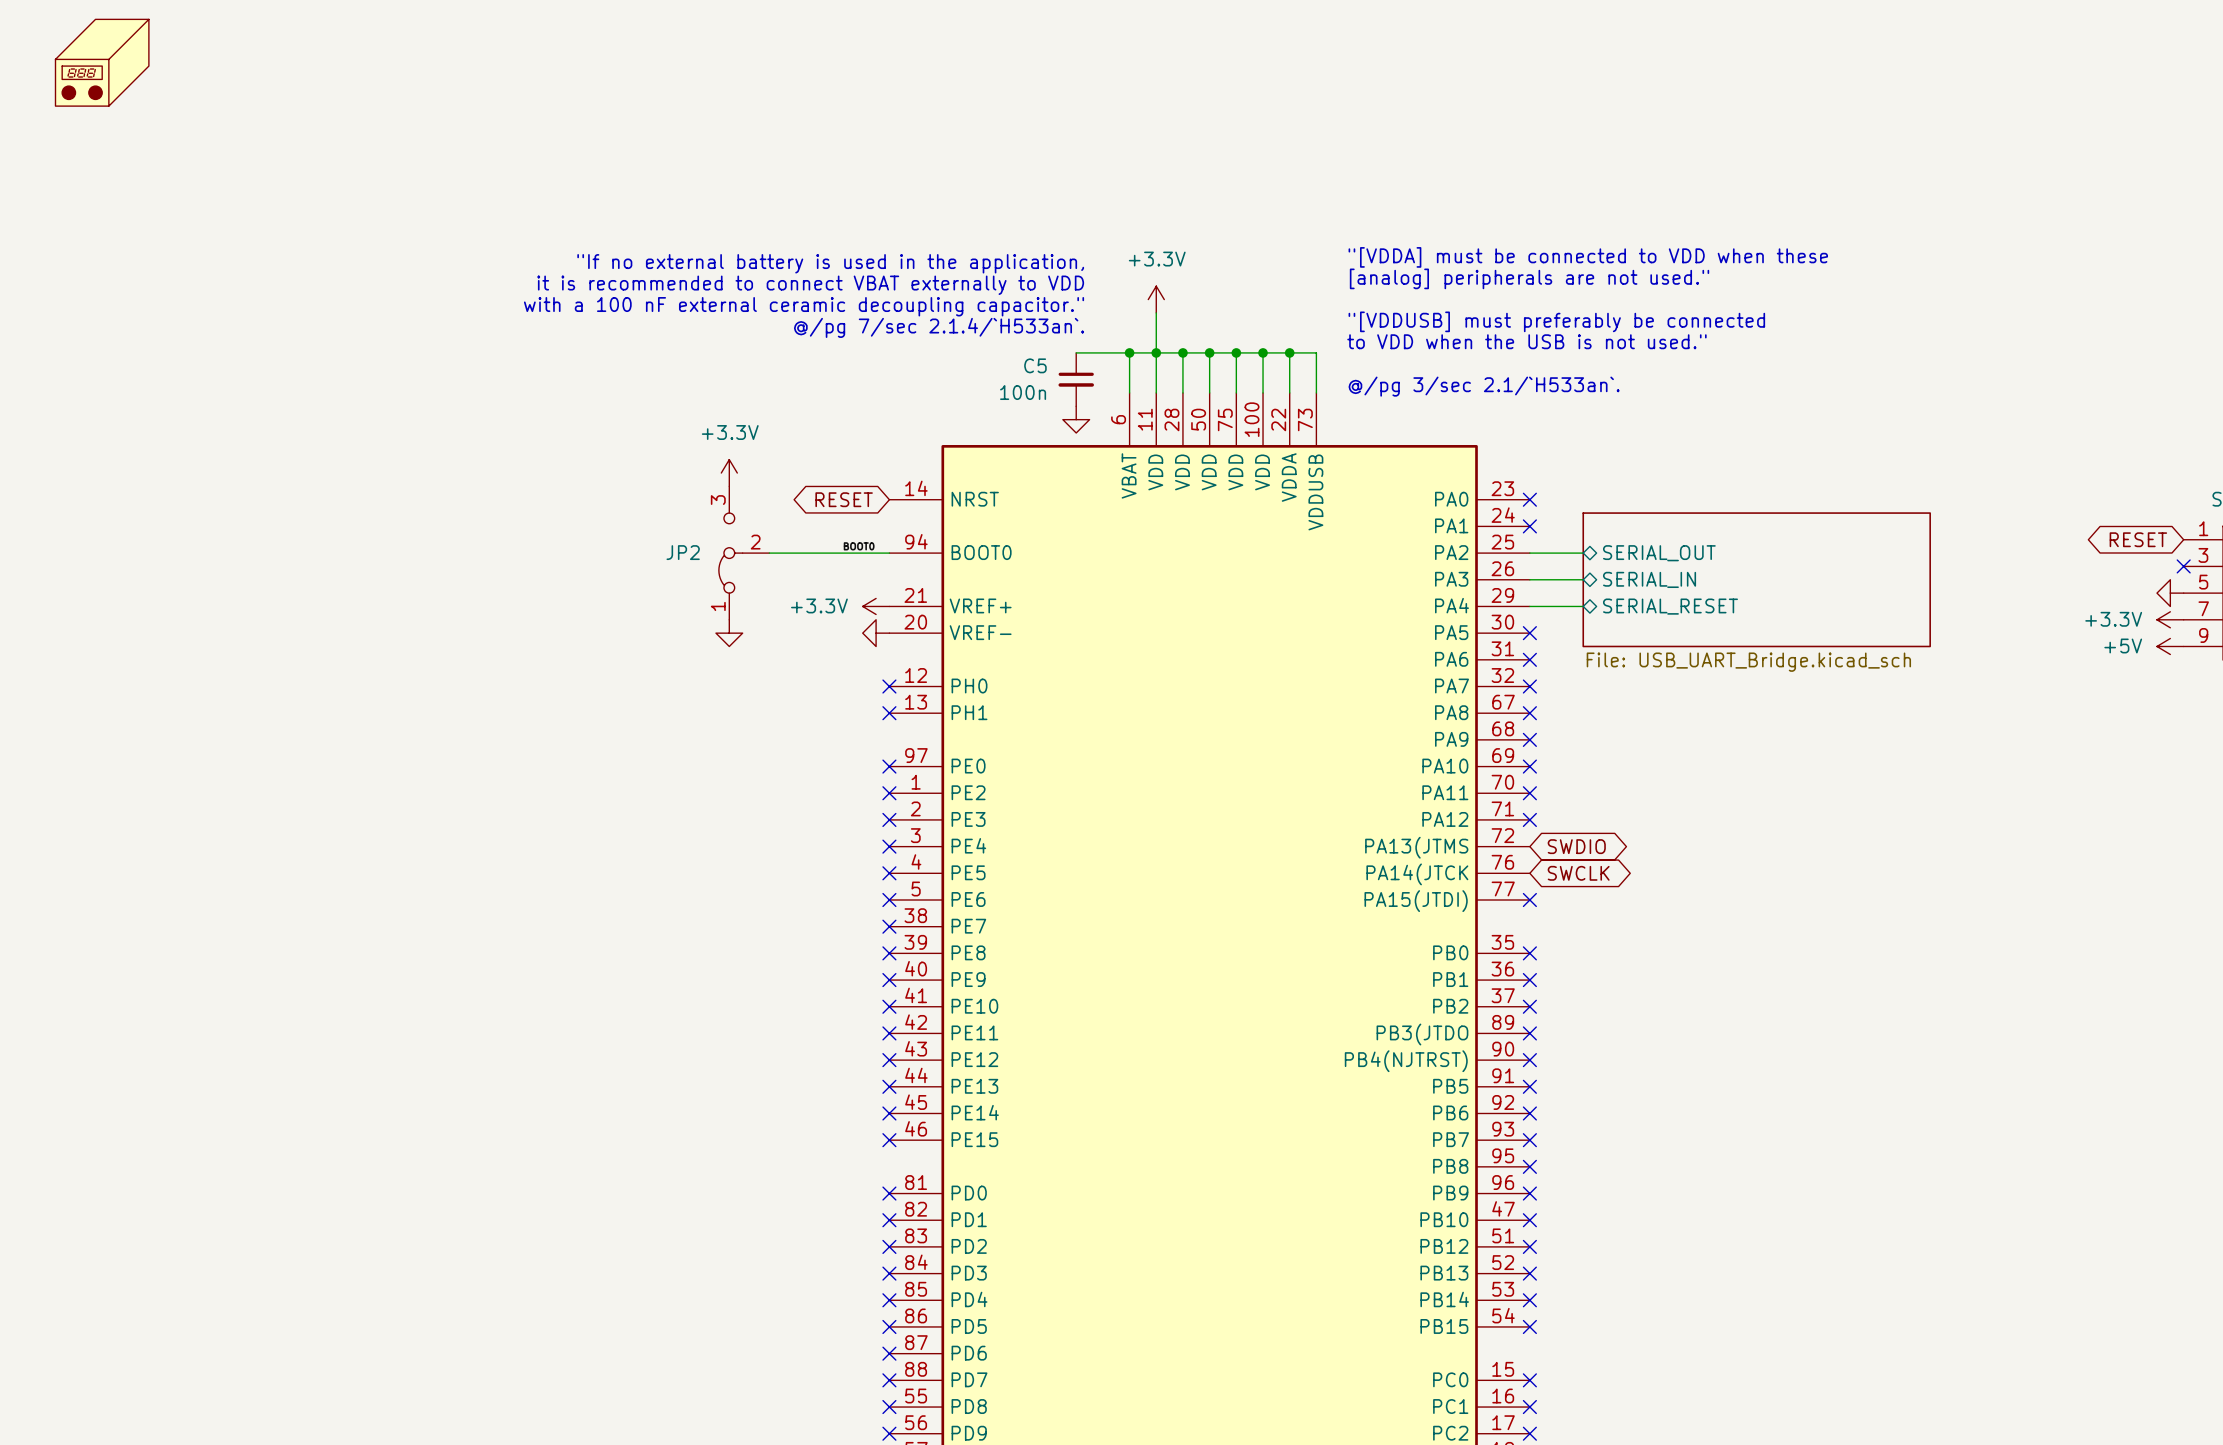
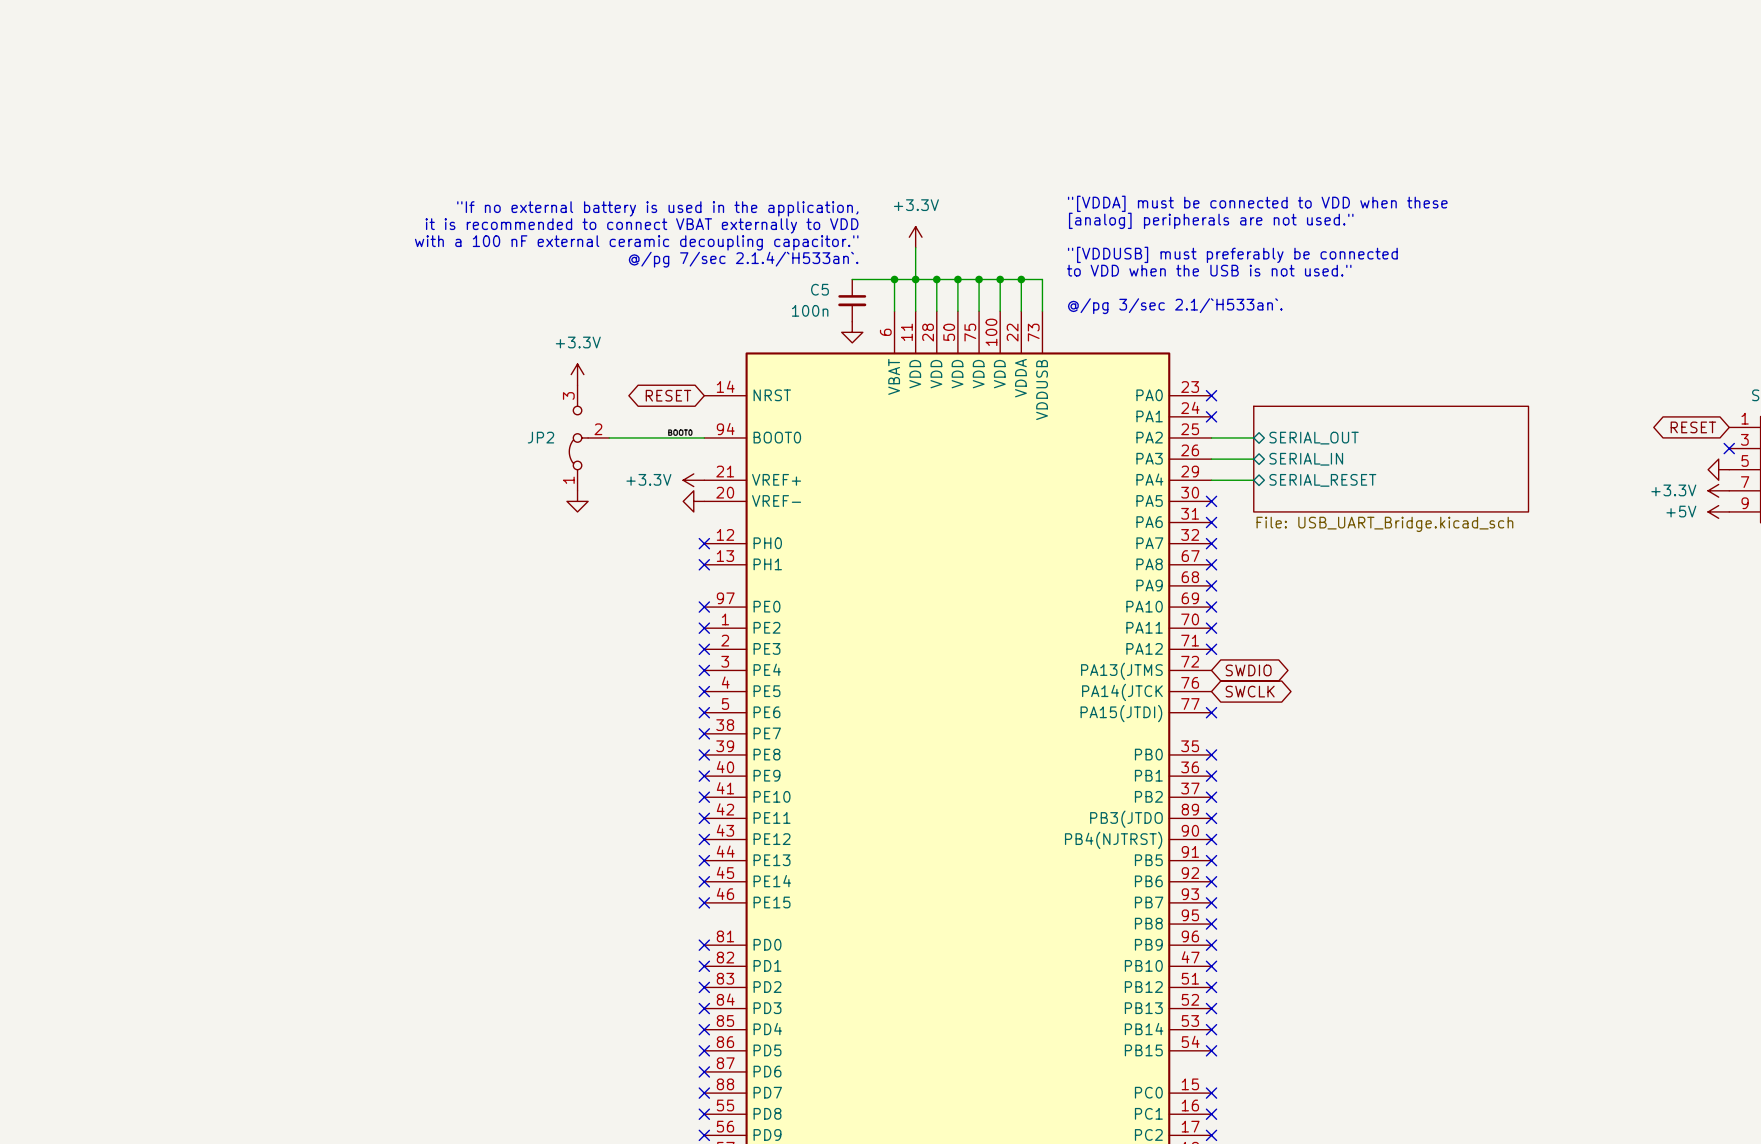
part: (102, 62) -> none

